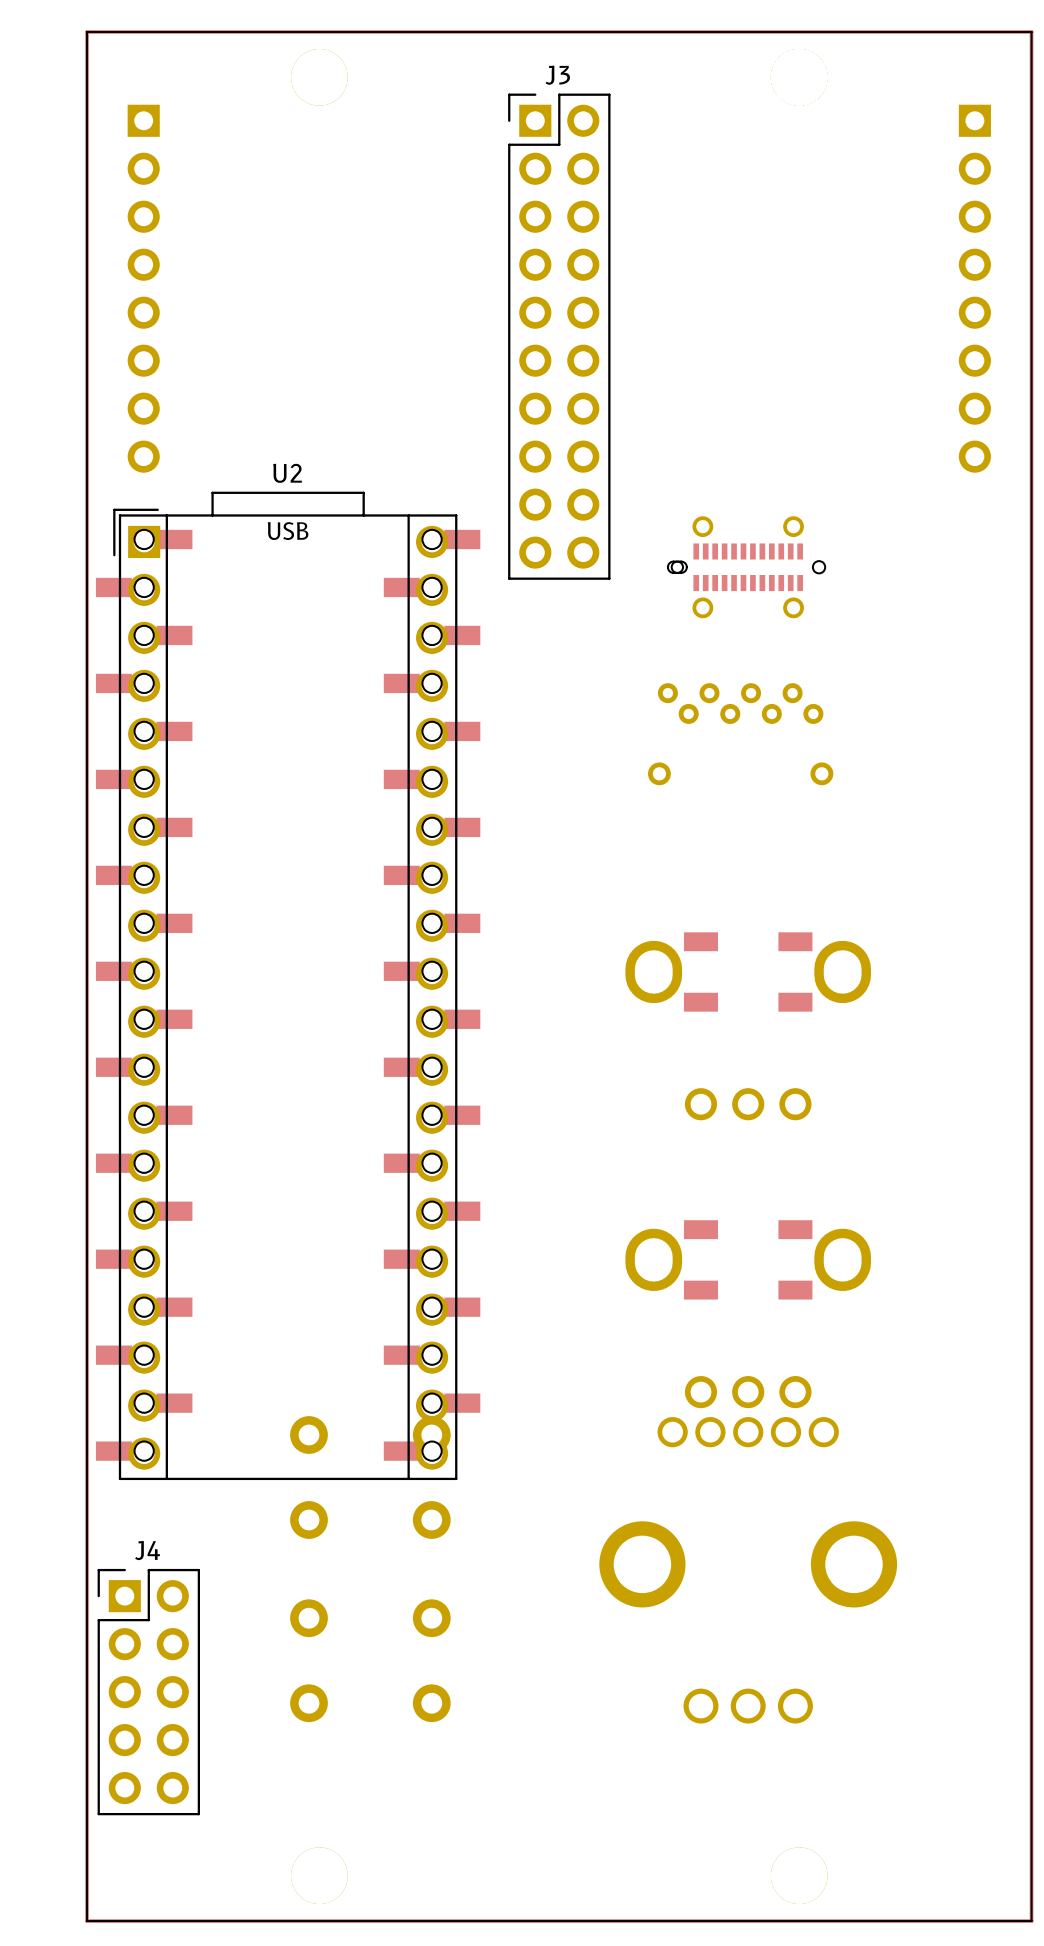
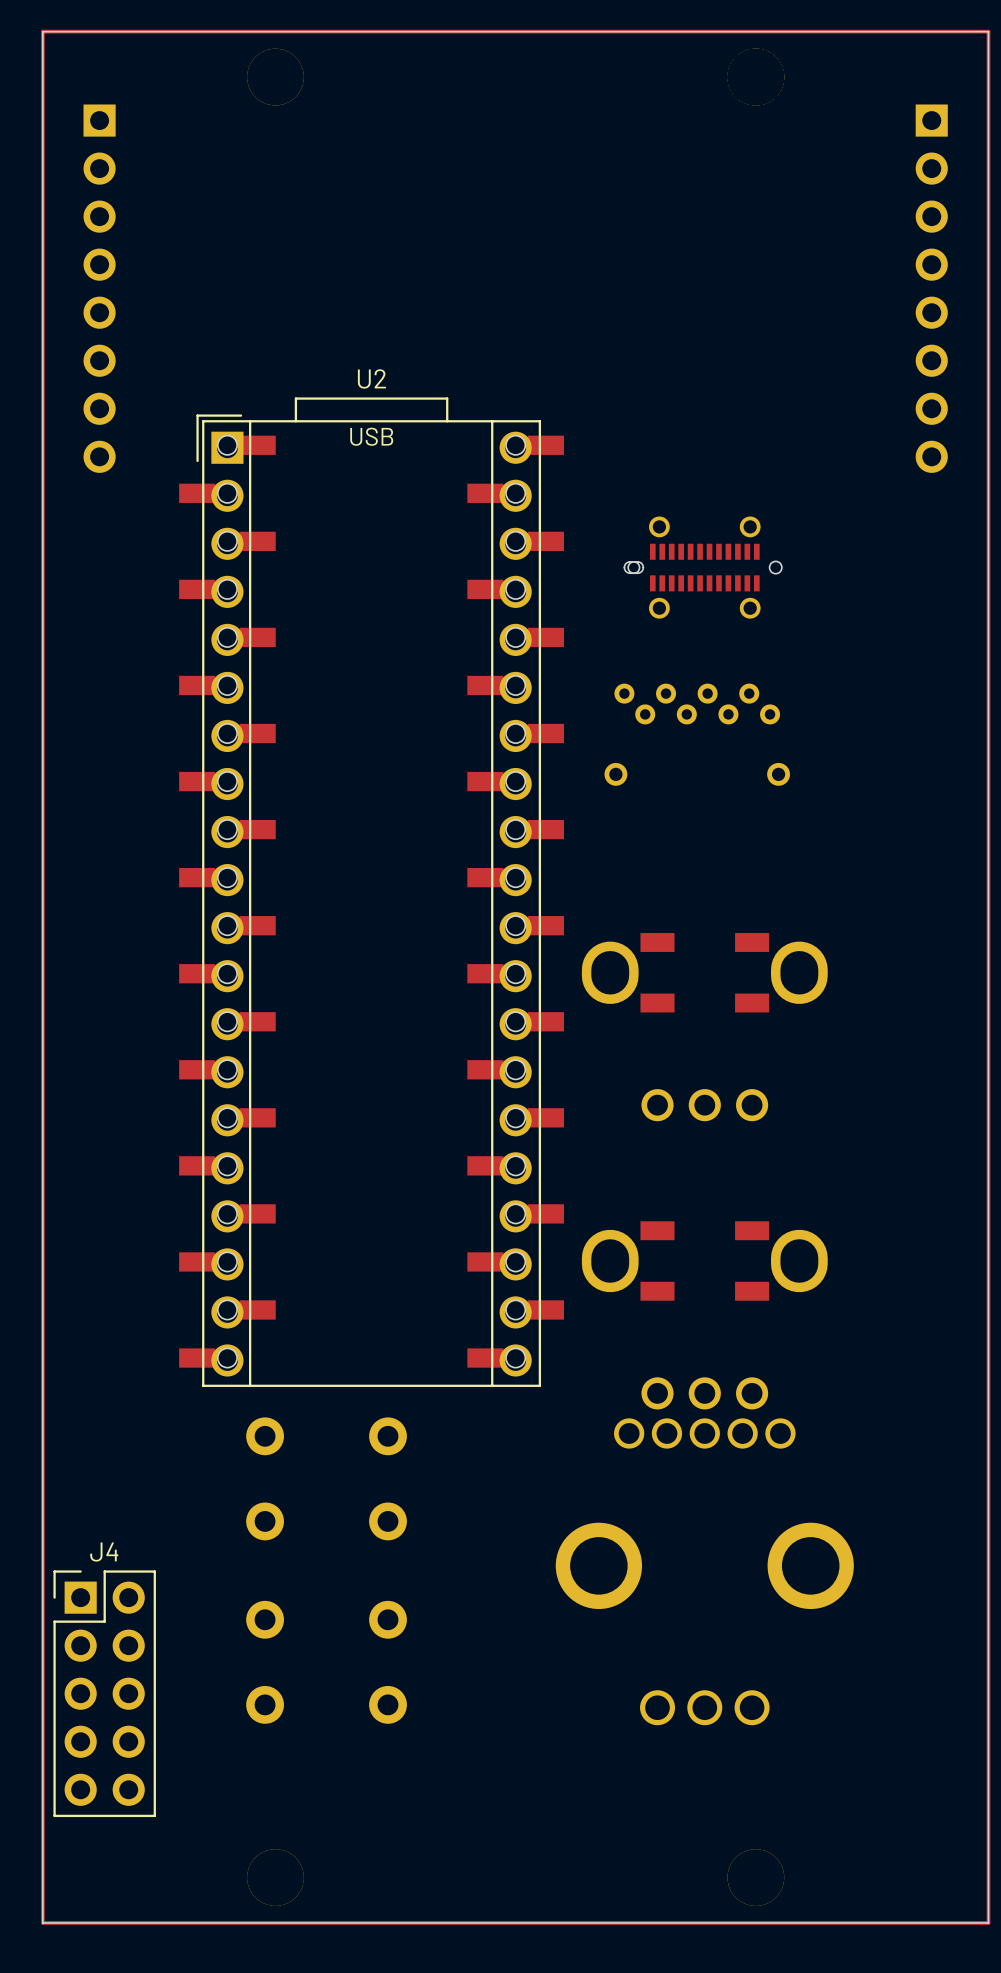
J3: (559, 336) -> none
part: none -> (227, 901)
part: none -> (515, 901)
U2 position: (285, 985) -> (368, 892)
part: (144, 995) -> none
part: (432, 995) -> none

